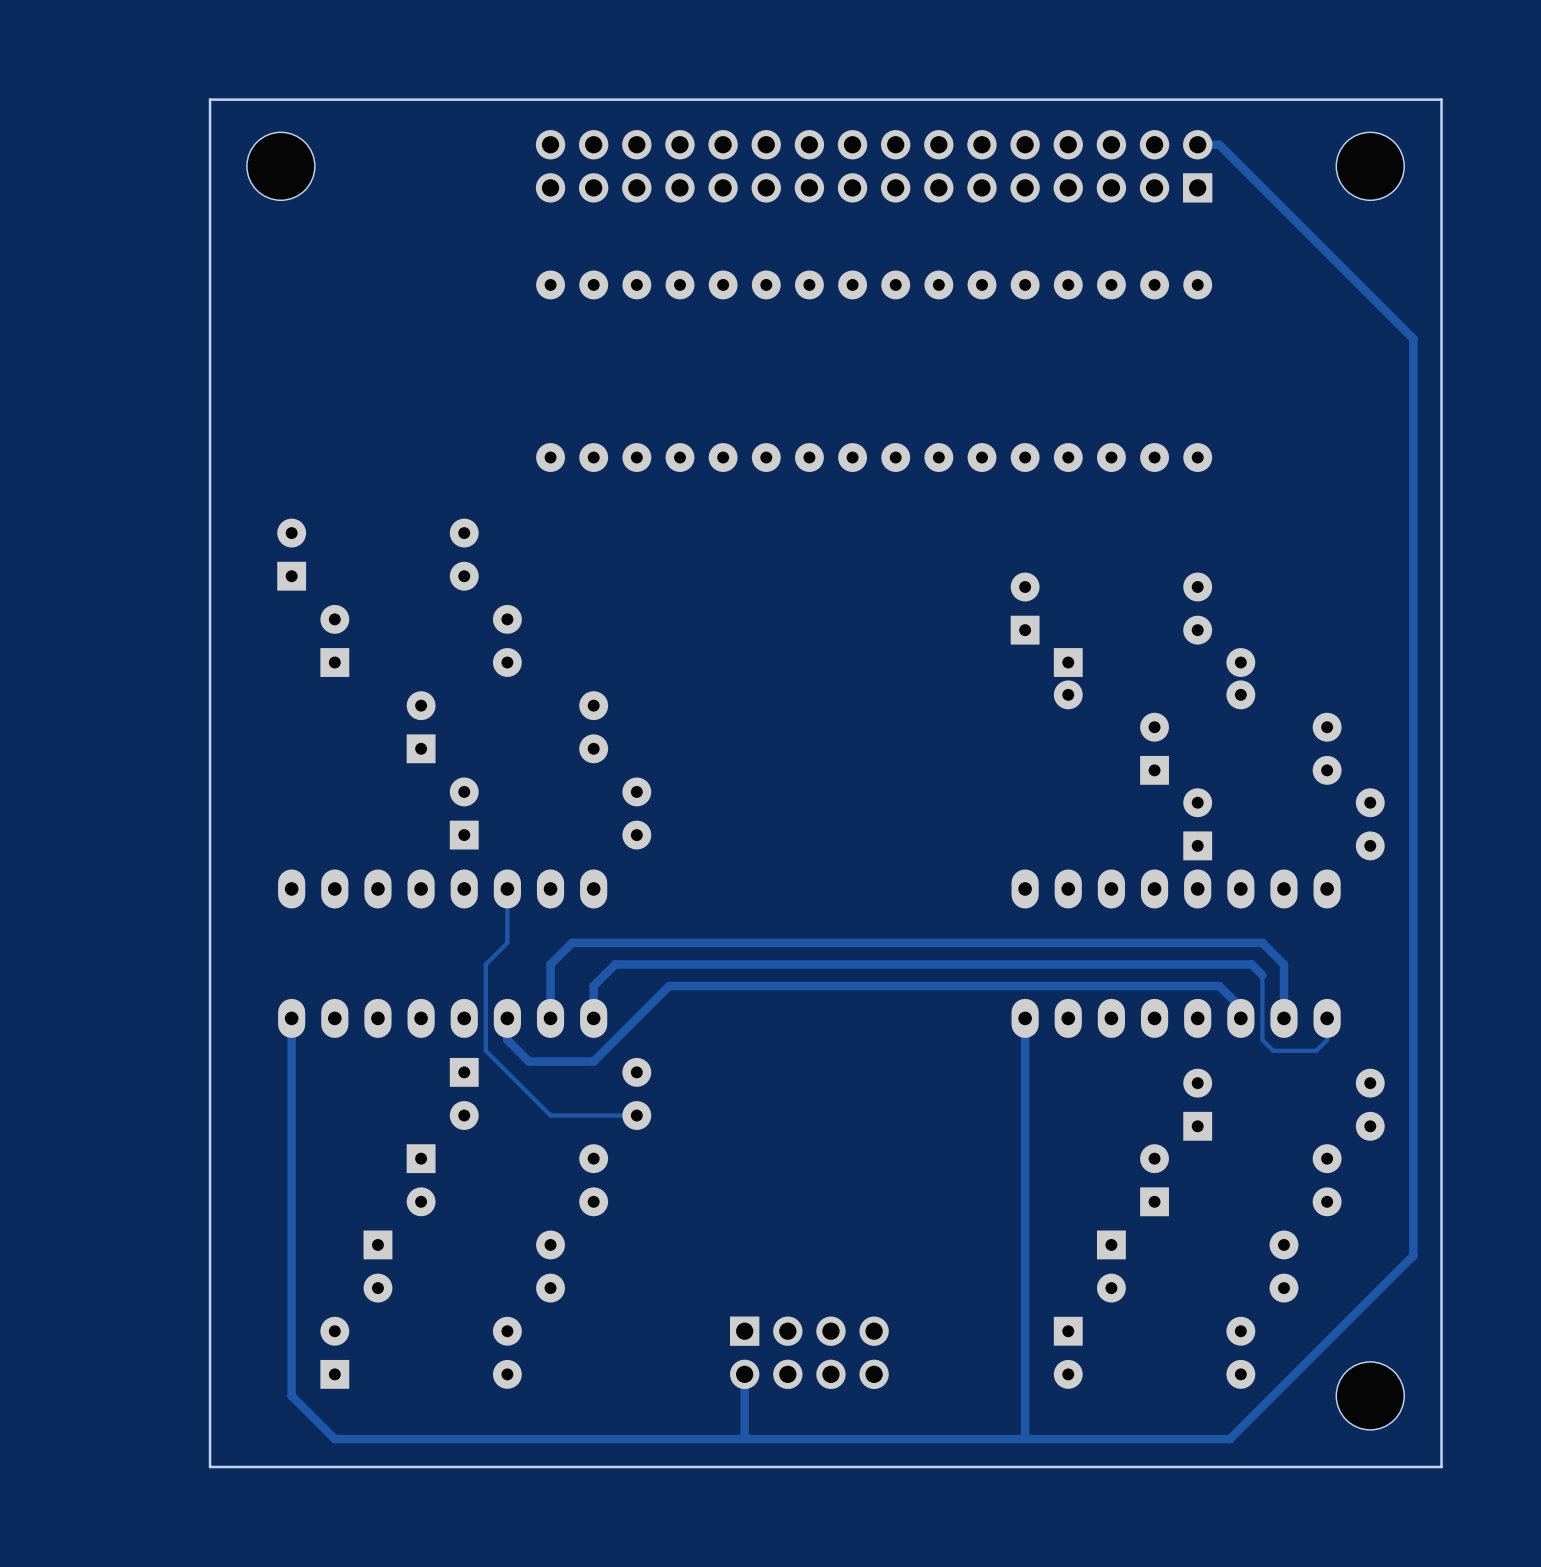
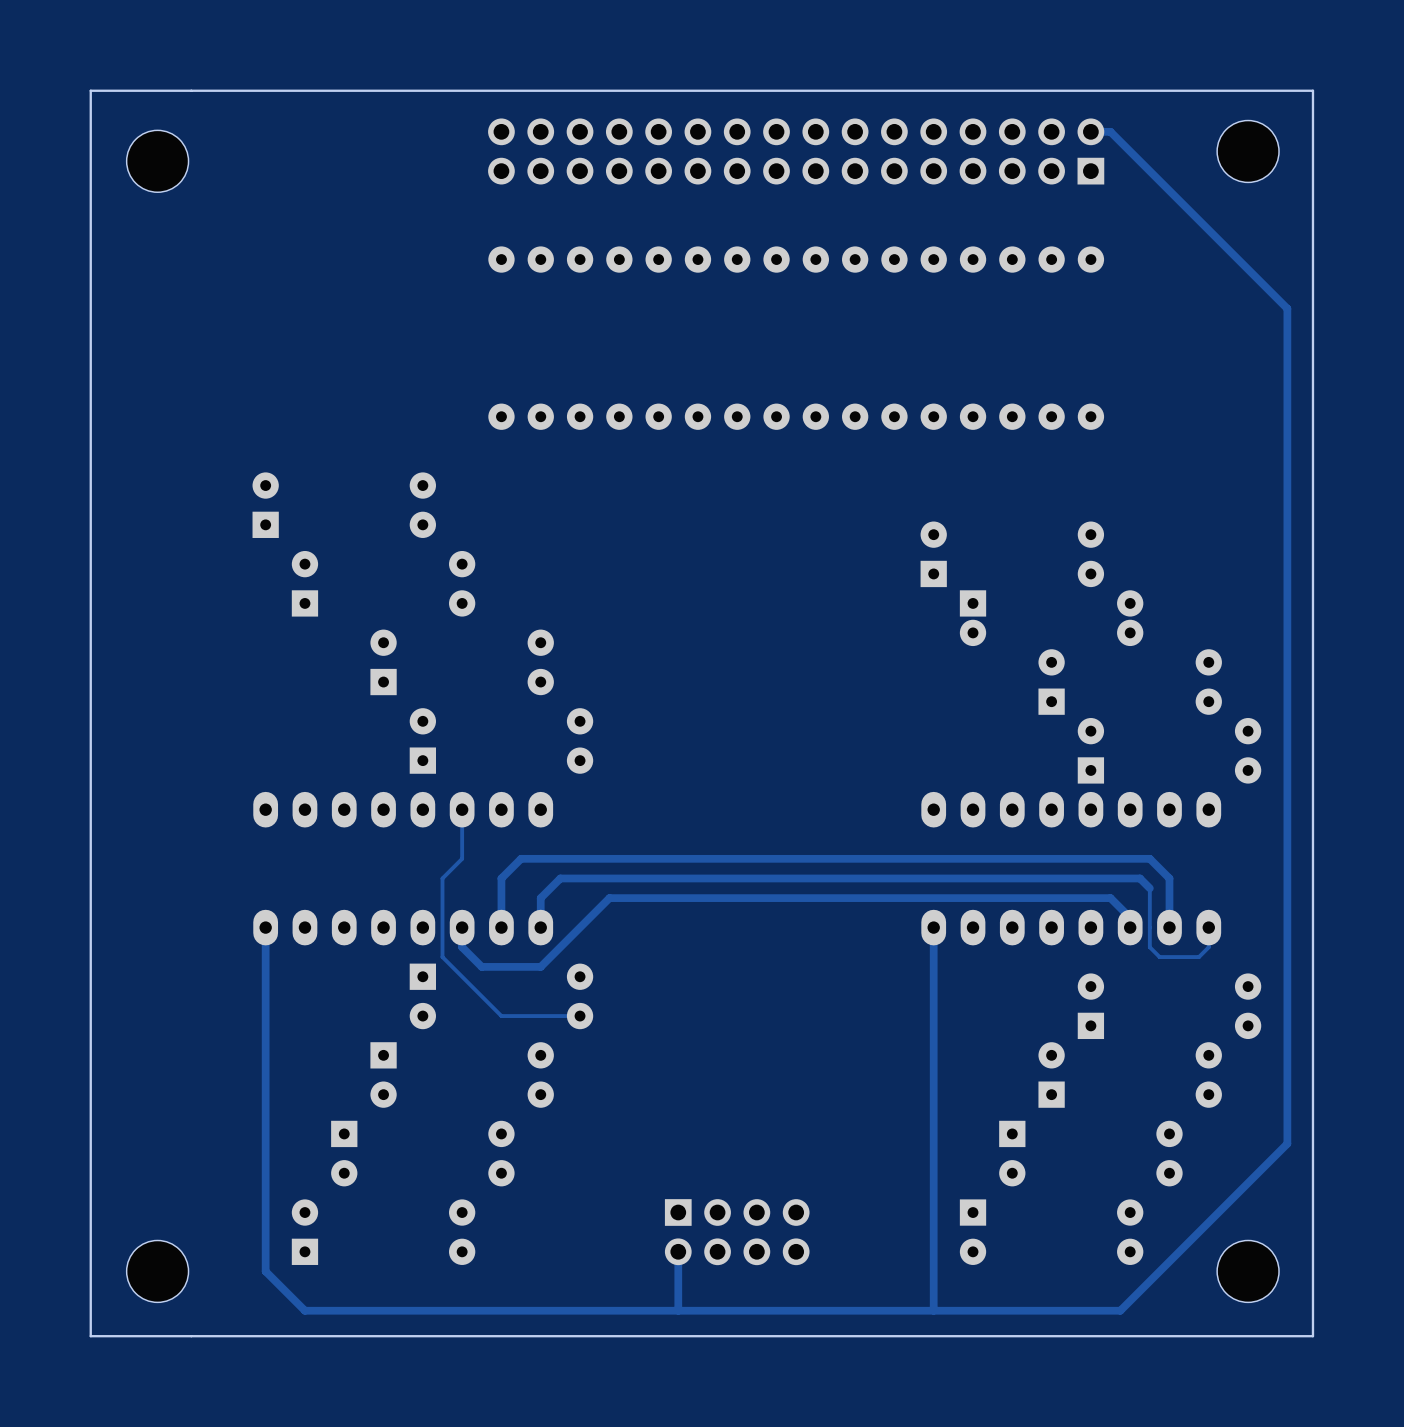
board edge: (210, 99) (210, 1466) -> (191, 90) (90, 90) (90, 1336) (191, 1336)
part position: (280, 166) -> (157, 161)
part: none -> (157, 1271)

